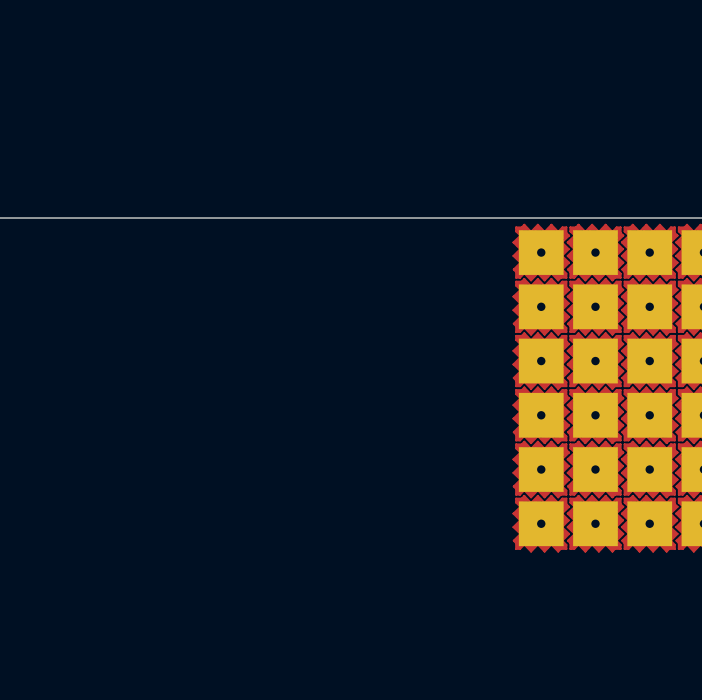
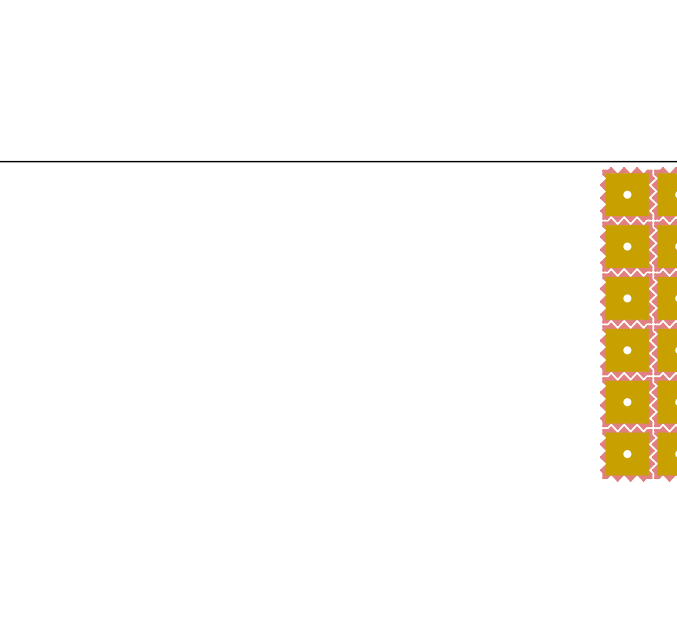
part: (541, 252) -> none
part: (595, 252) -> none
part: (541, 306) -> none
part: (595, 306) -> none
part: (541, 361) -> none
part: (595, 361) -> none
part: (541, 415) -> none
part: (595, 415) -> none
part: (541, 469) -> none
part: (595, 469) -> none
part: (541, 523) -> none
part: (595, 523) -> none

